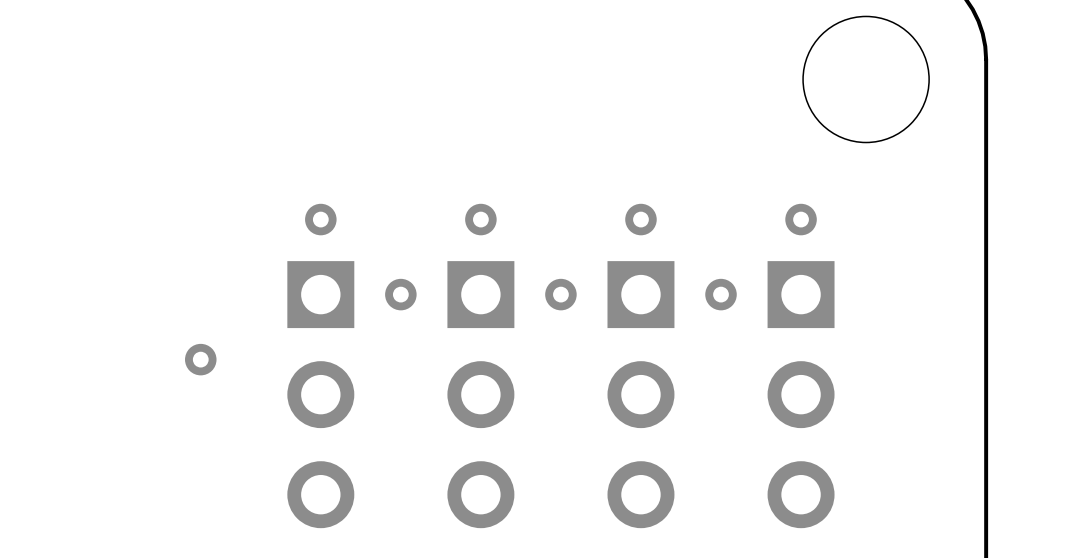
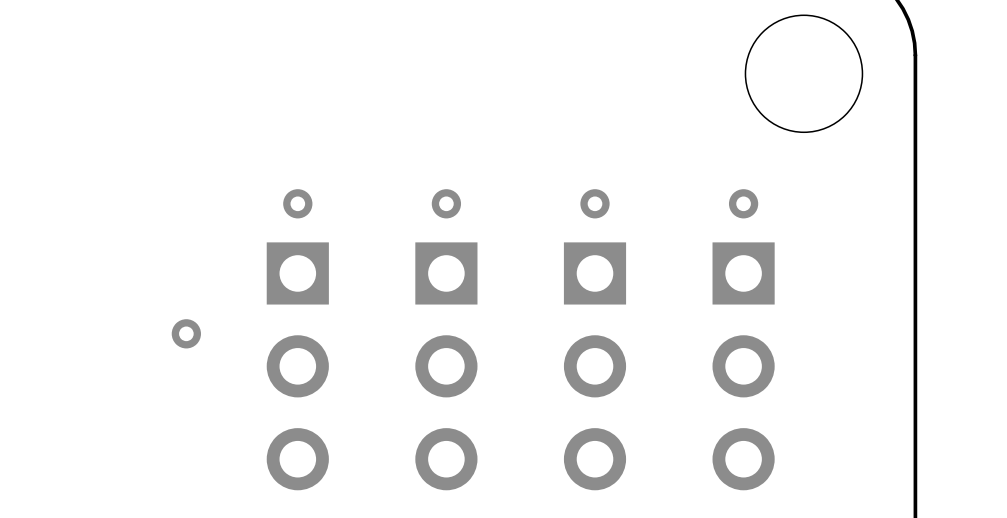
via: (400, 294) -> none
via: (560, 294) -> none
via: (721, 294) -> none

